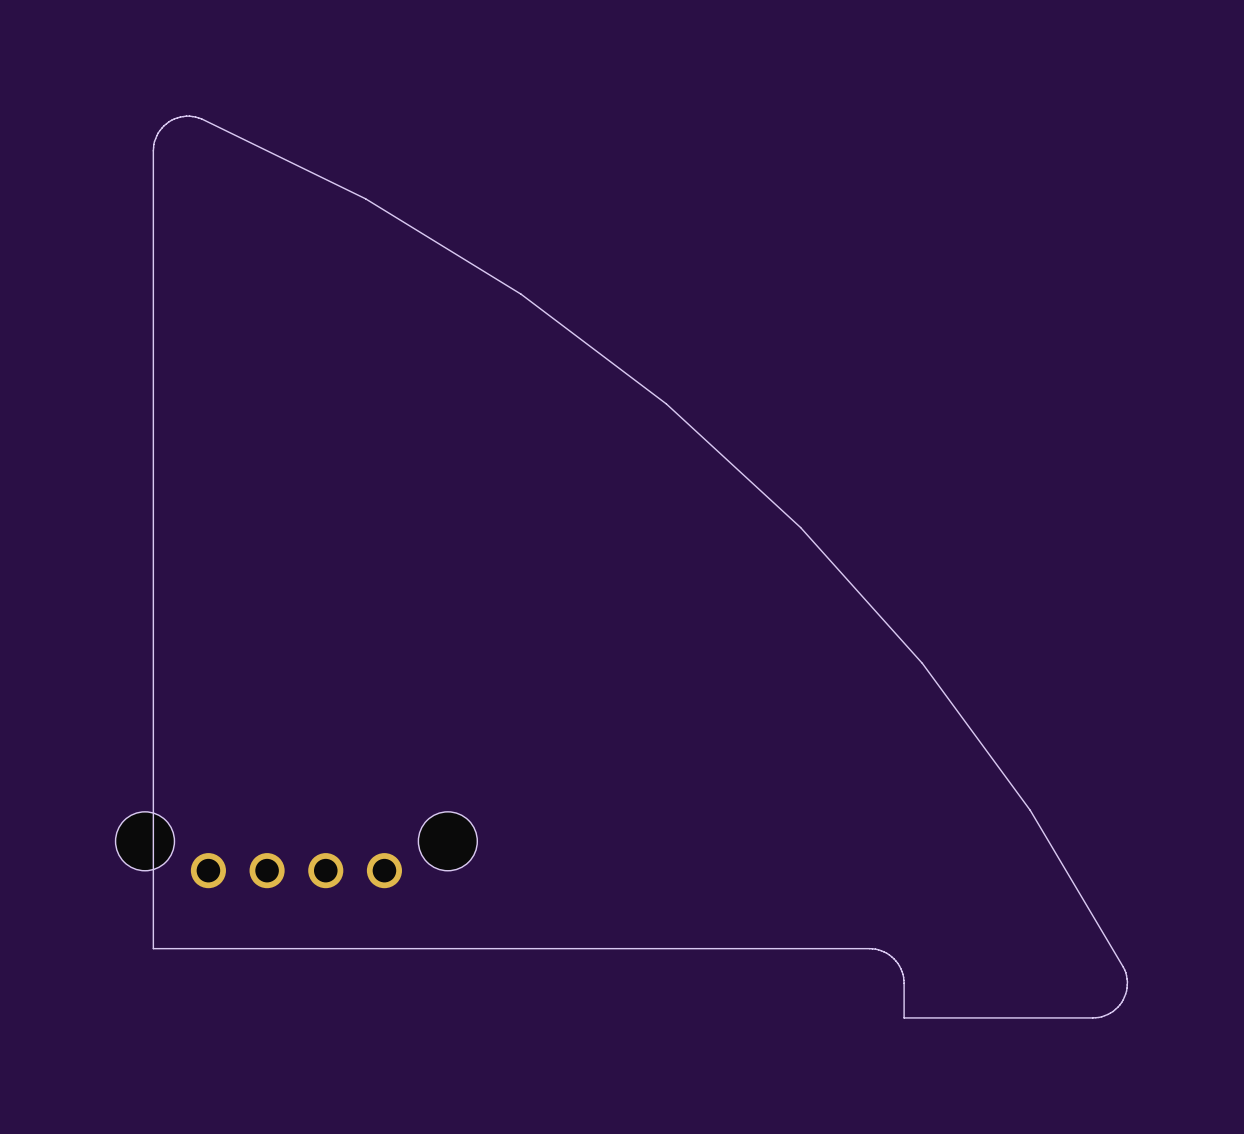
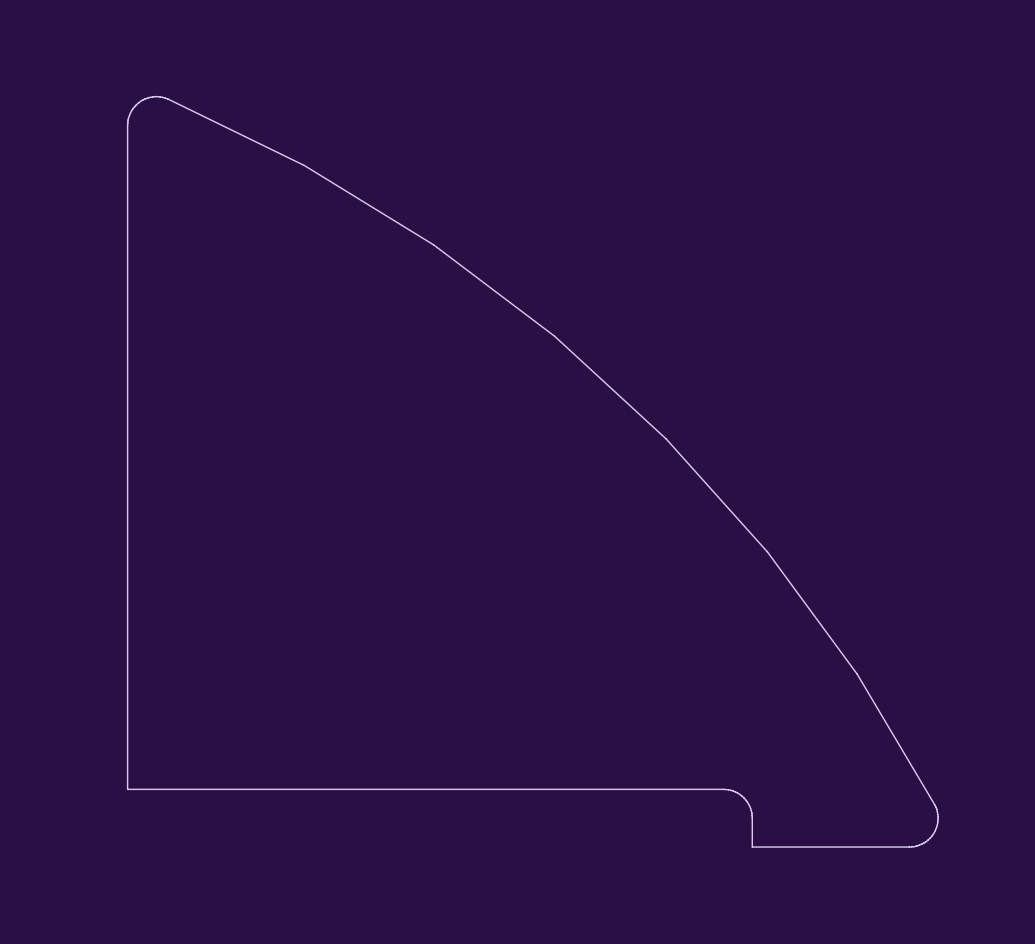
part: (296, 850) -> none

